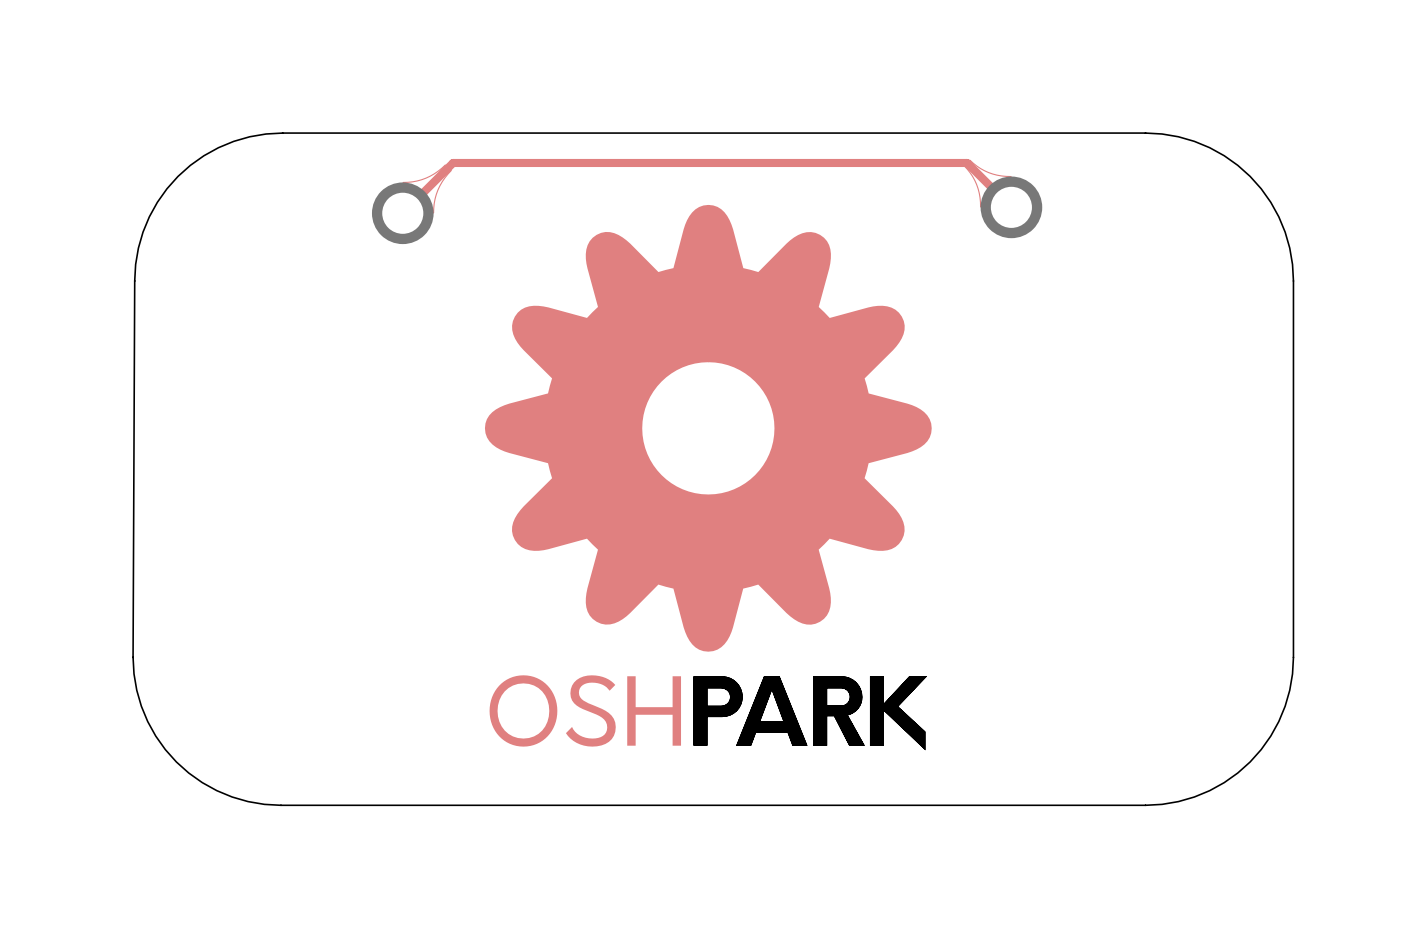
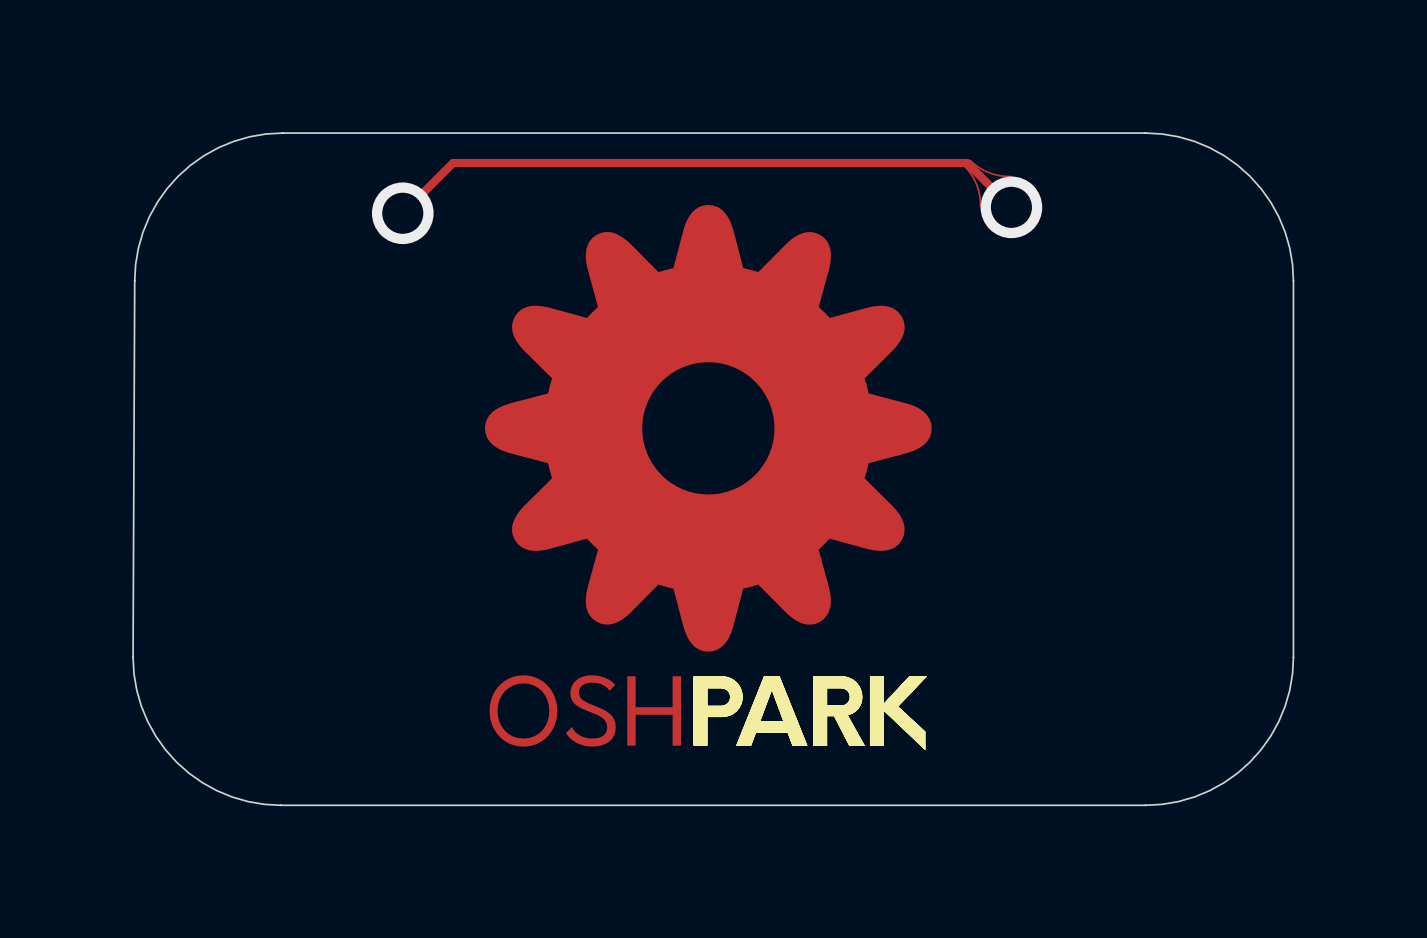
zone outline: (445, 164) (425, 178) (403, 182) (391, 224) (433, 212) (437, 190) (451, 170) (445, 164) -> none

